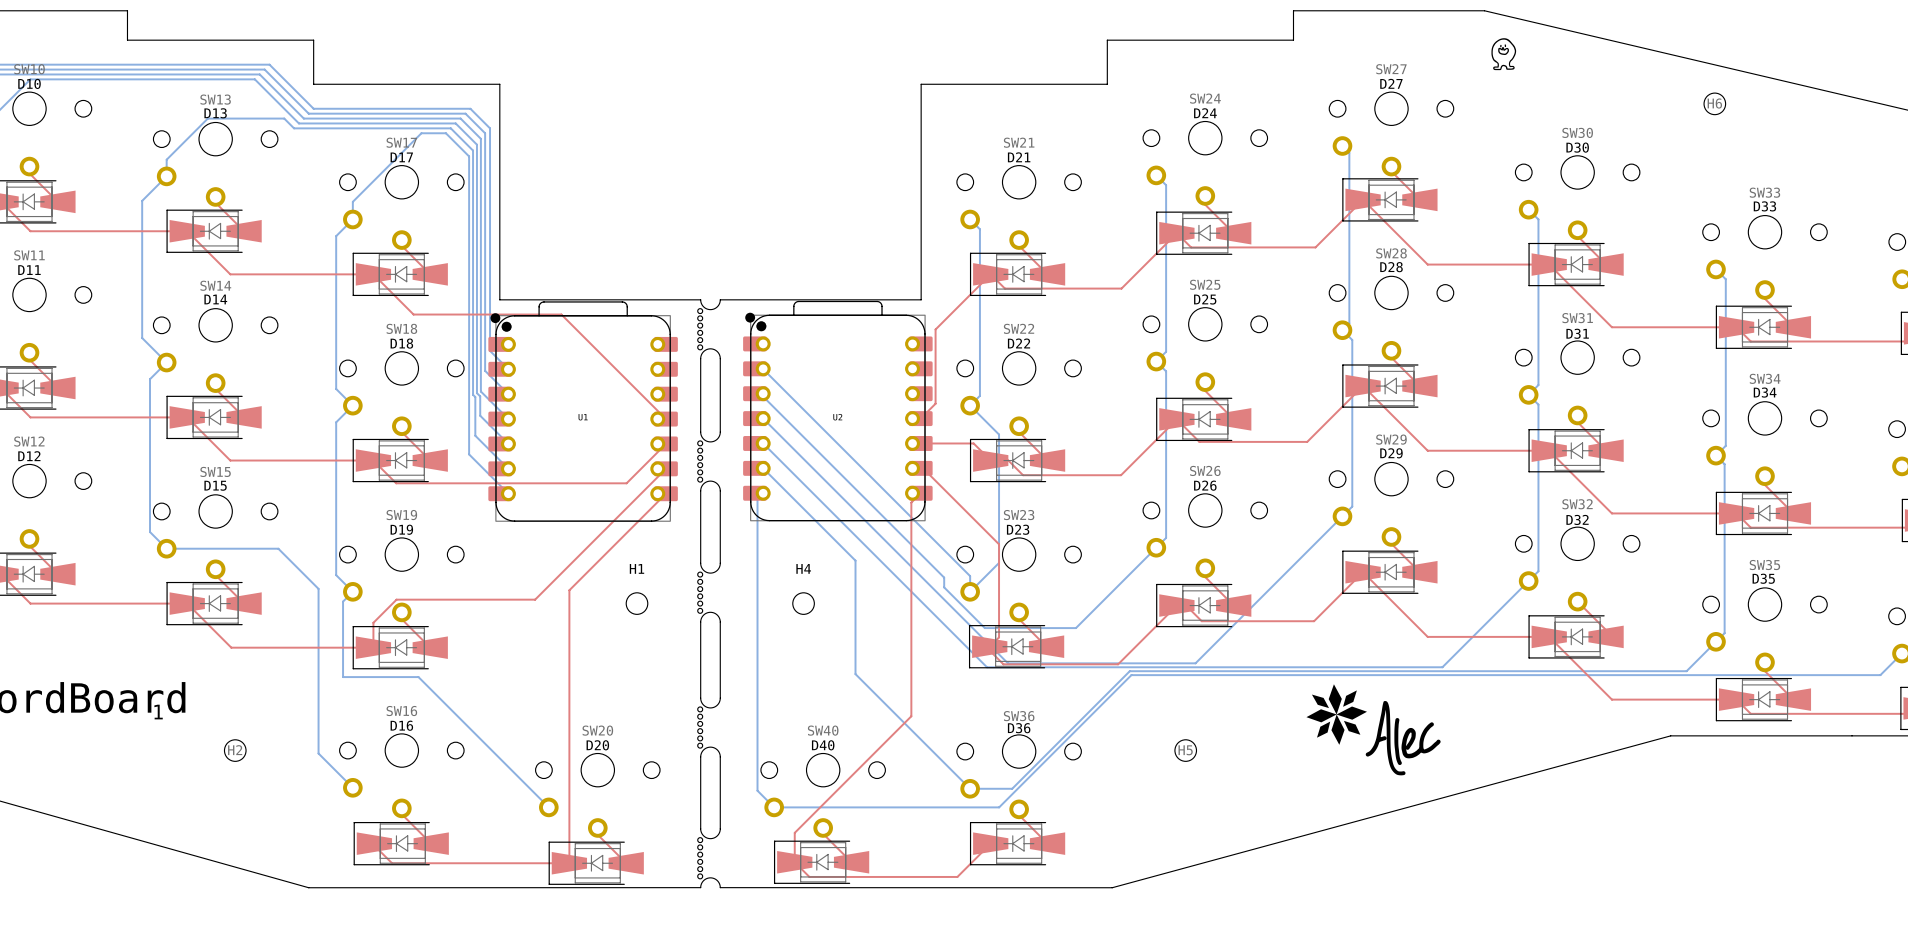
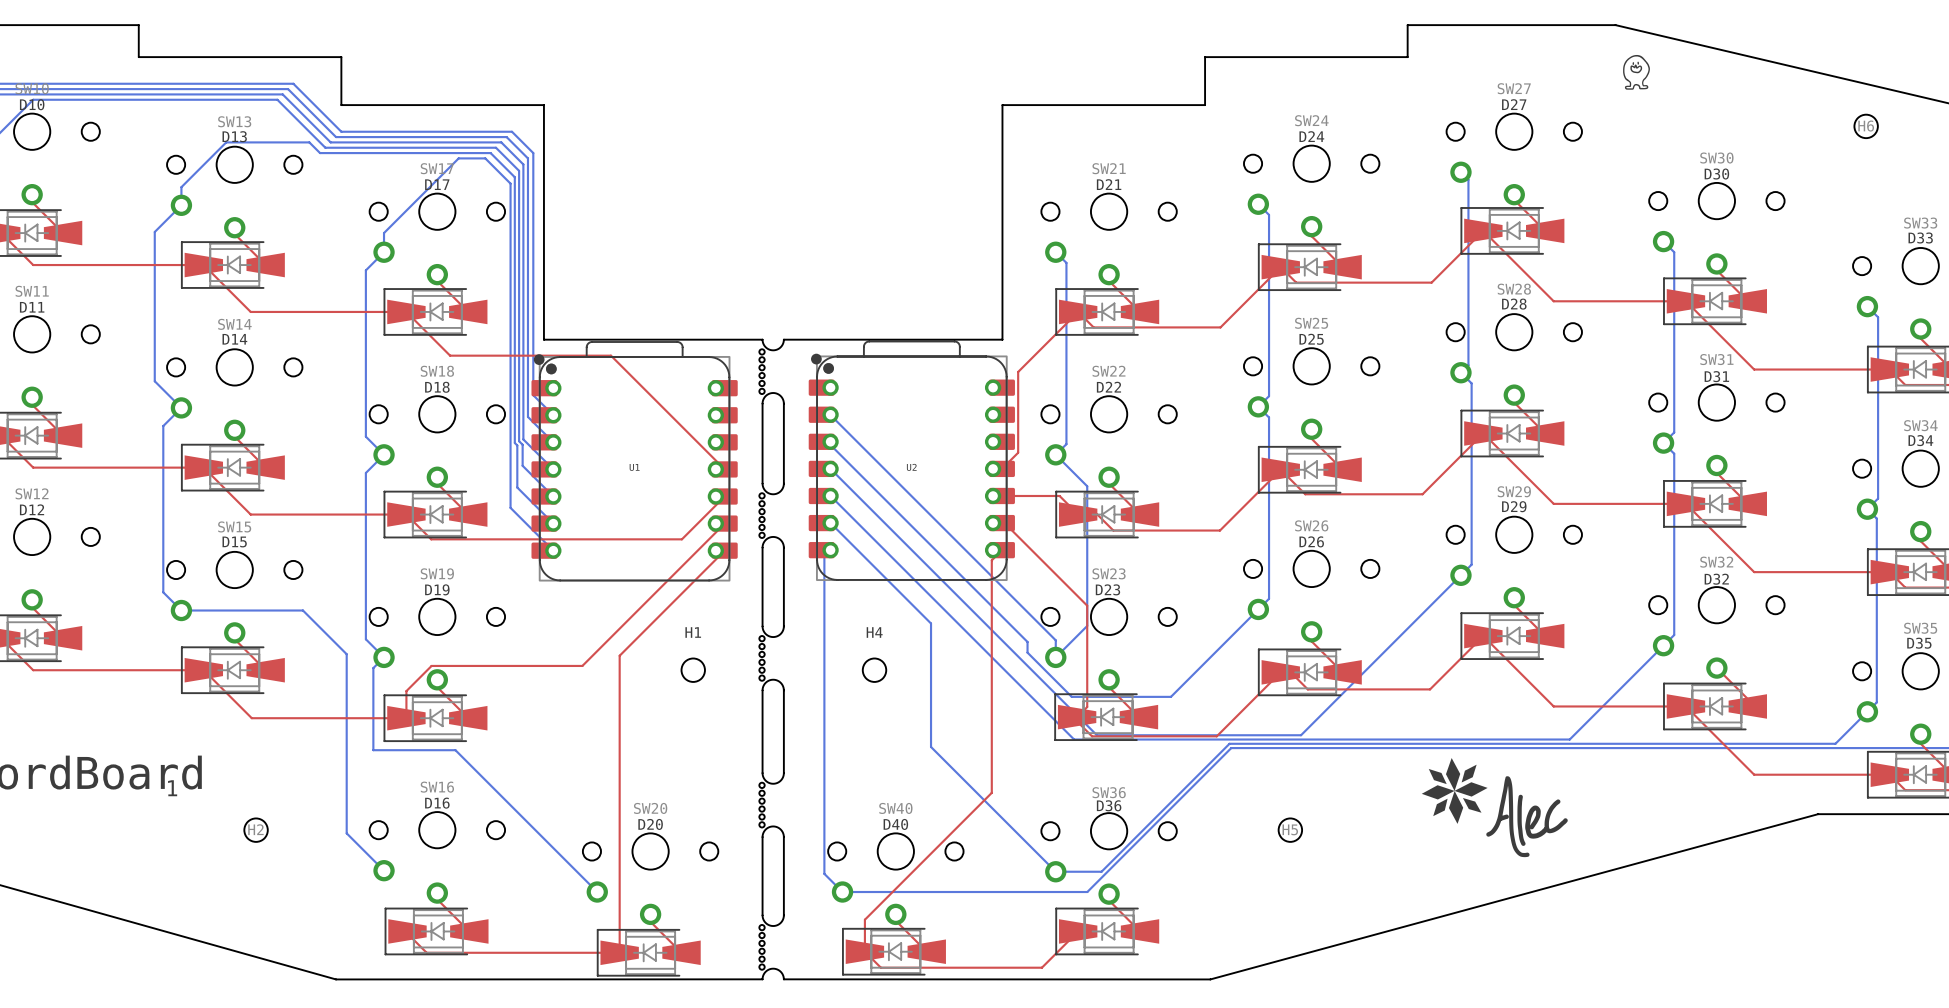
drawing: [1311, 694, 1330, 709] -> none
drawing: none -> [1462, 798, 1482, 813]
drawing position: (1352, 727) -> (1437, 776)
drawing position: (1352, 727) -> (1437, 776)

